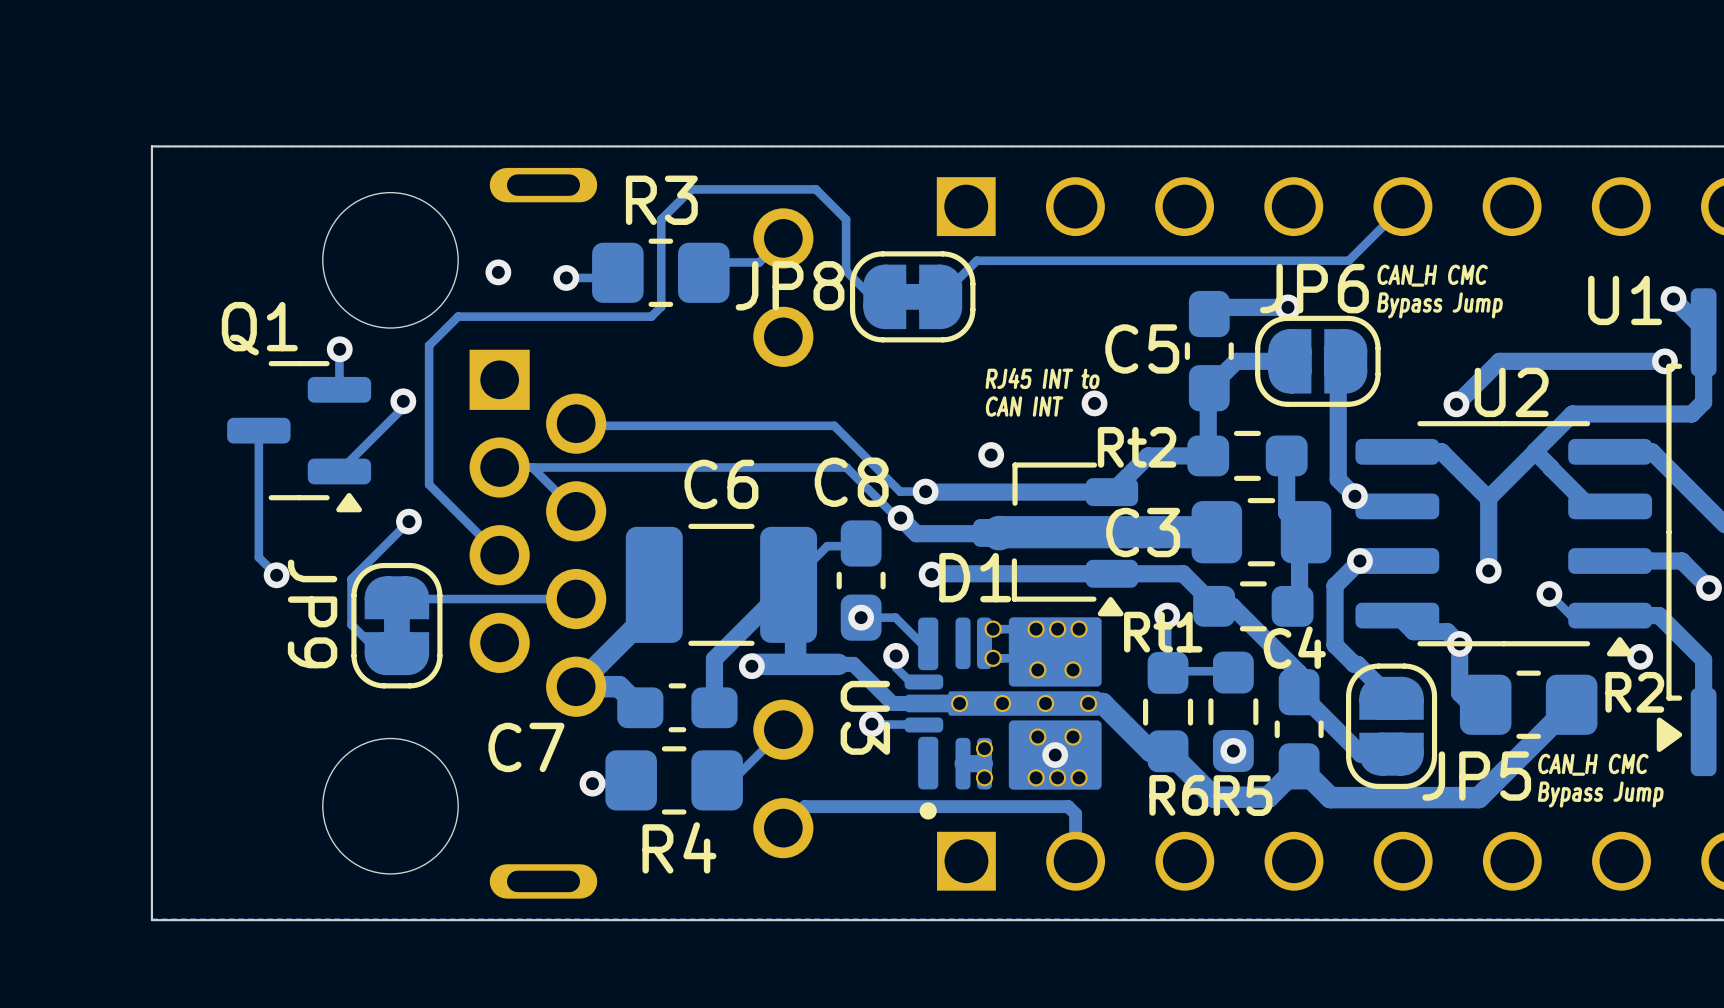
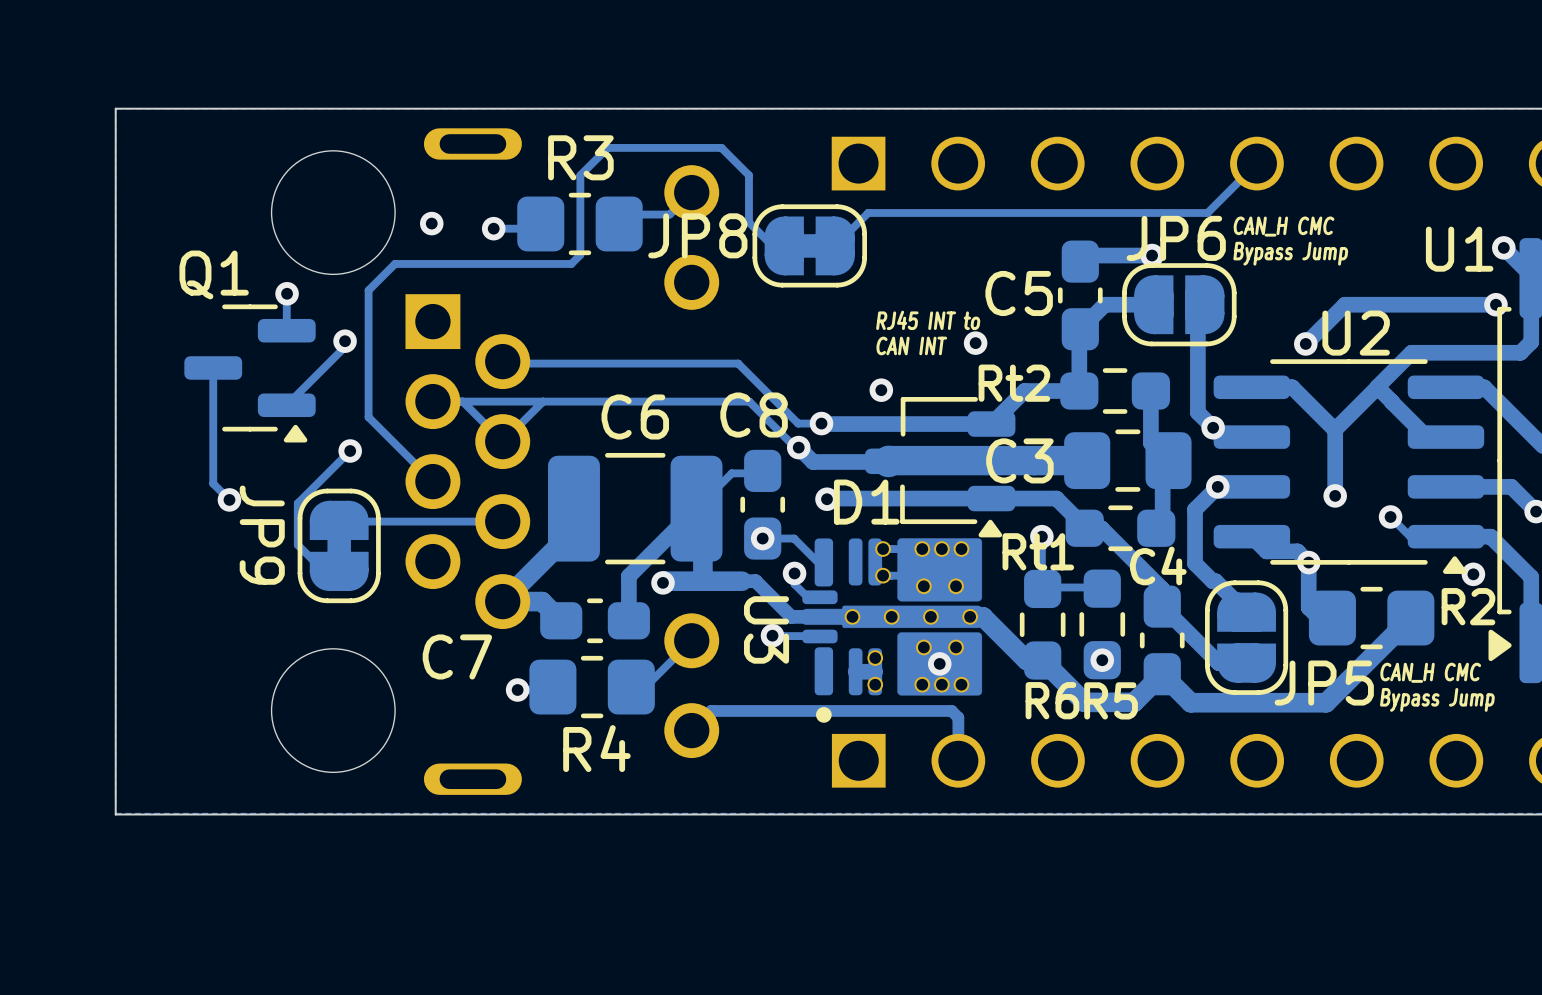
track: none -> (543, 401) (503, 441)

